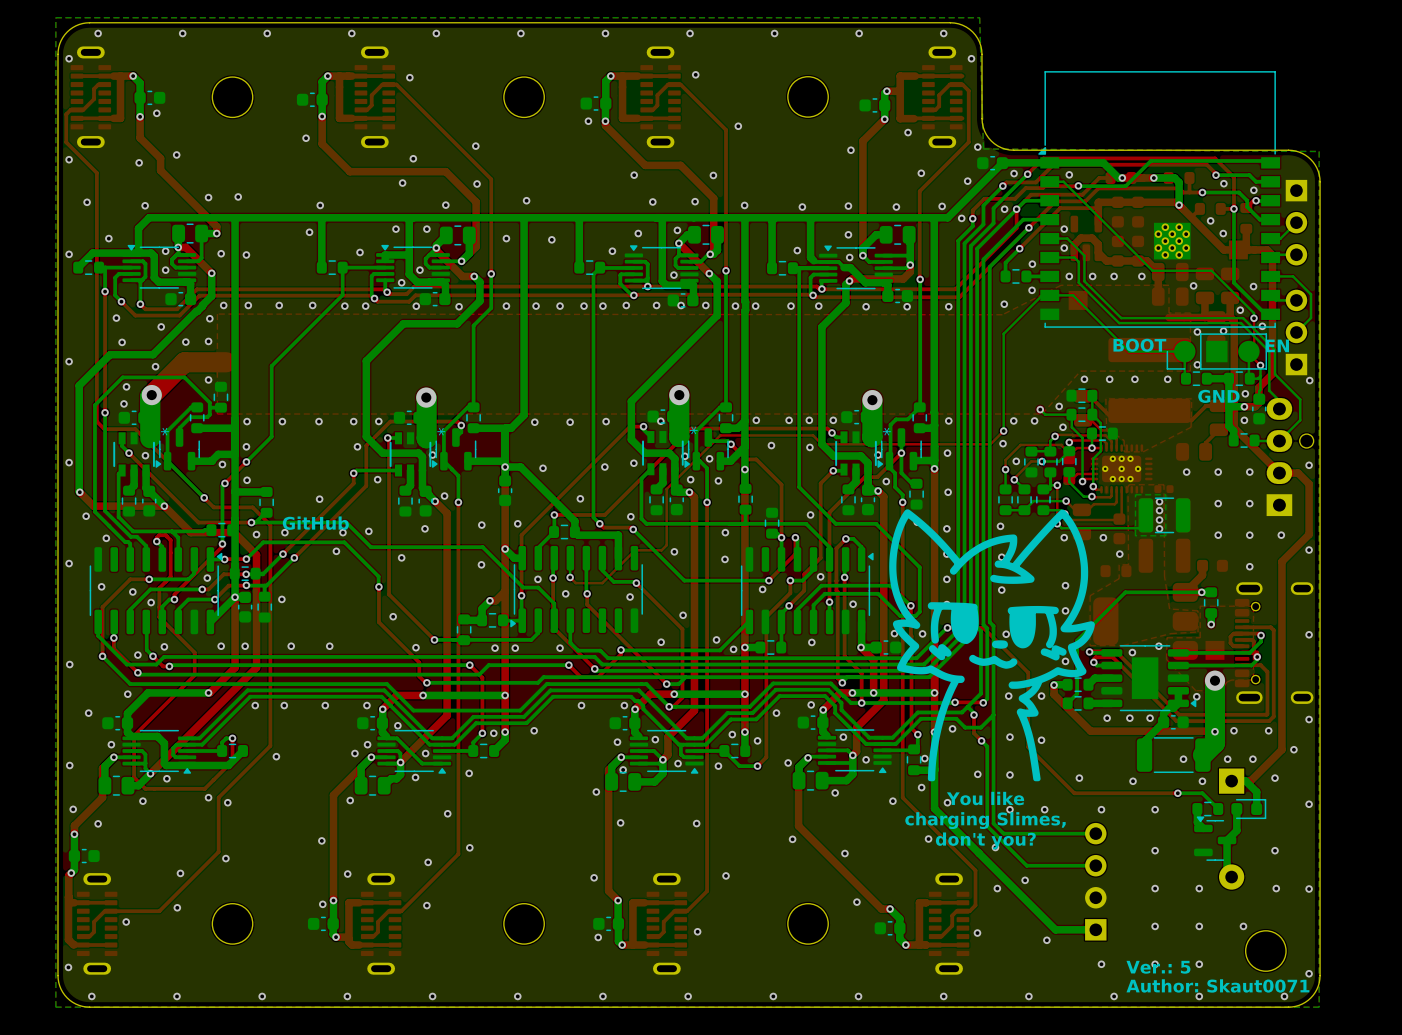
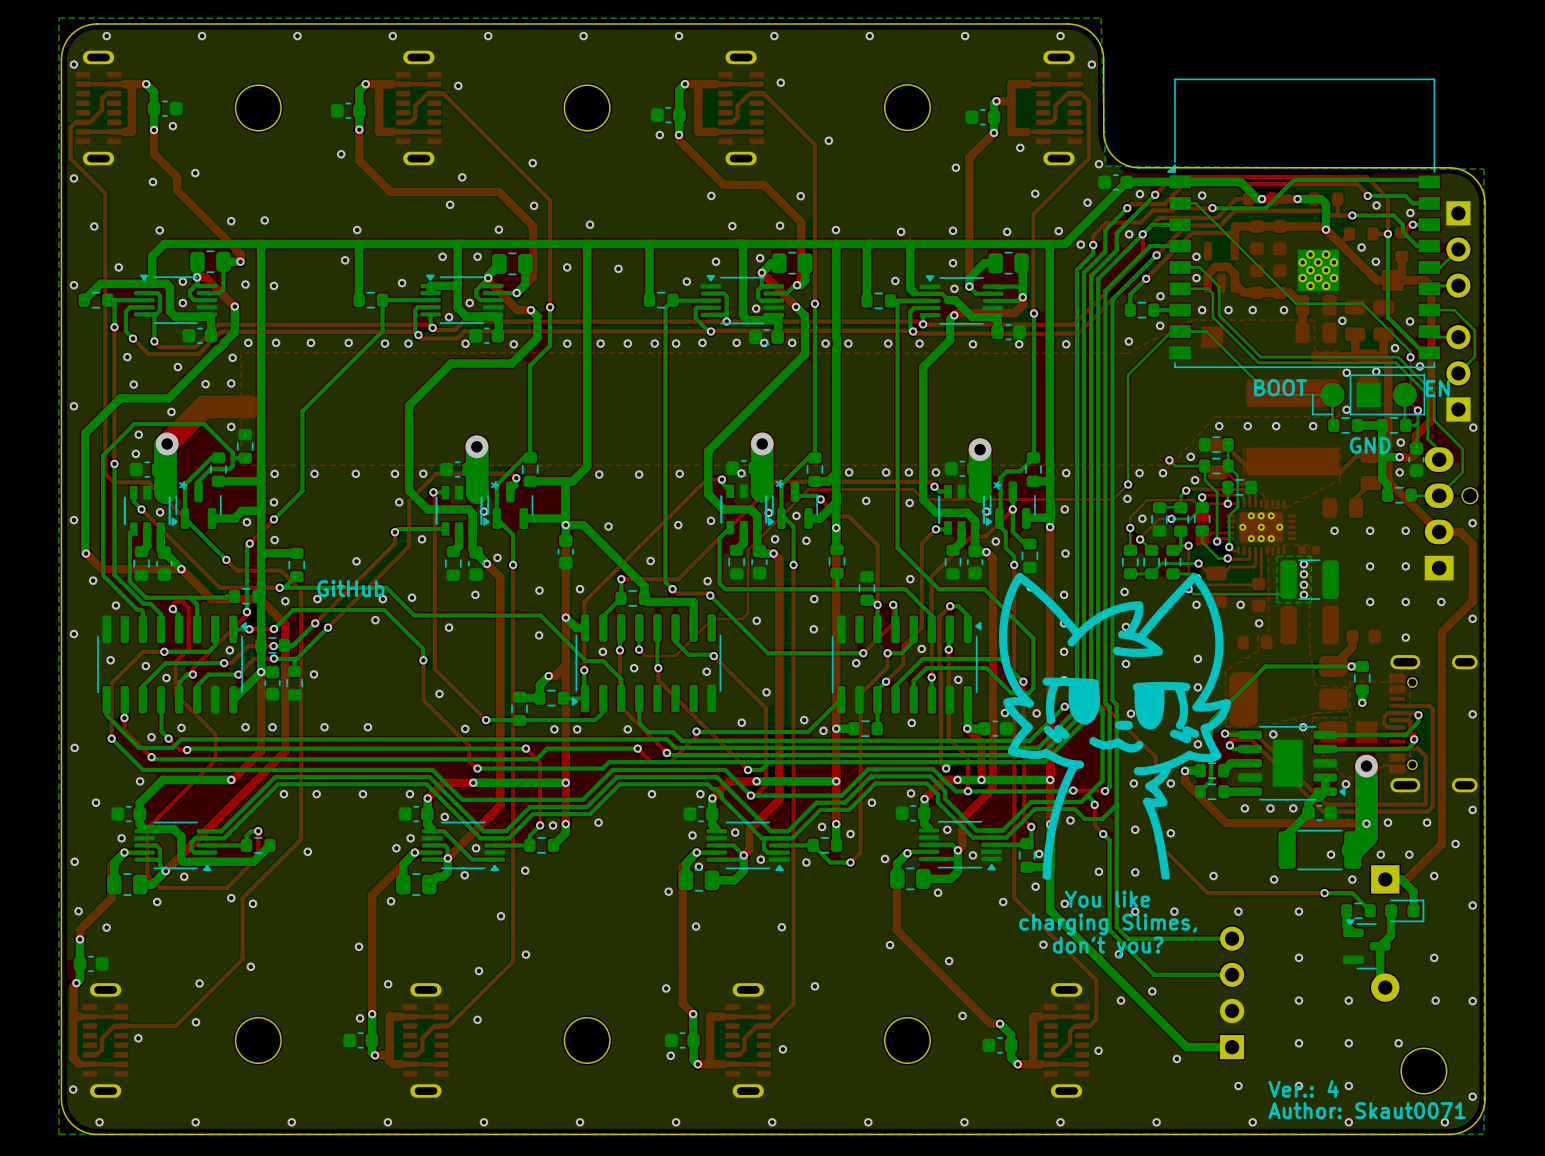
text: Ver.: 5 (1158, 967) -> Ver.: 4 (1303, 1088)

